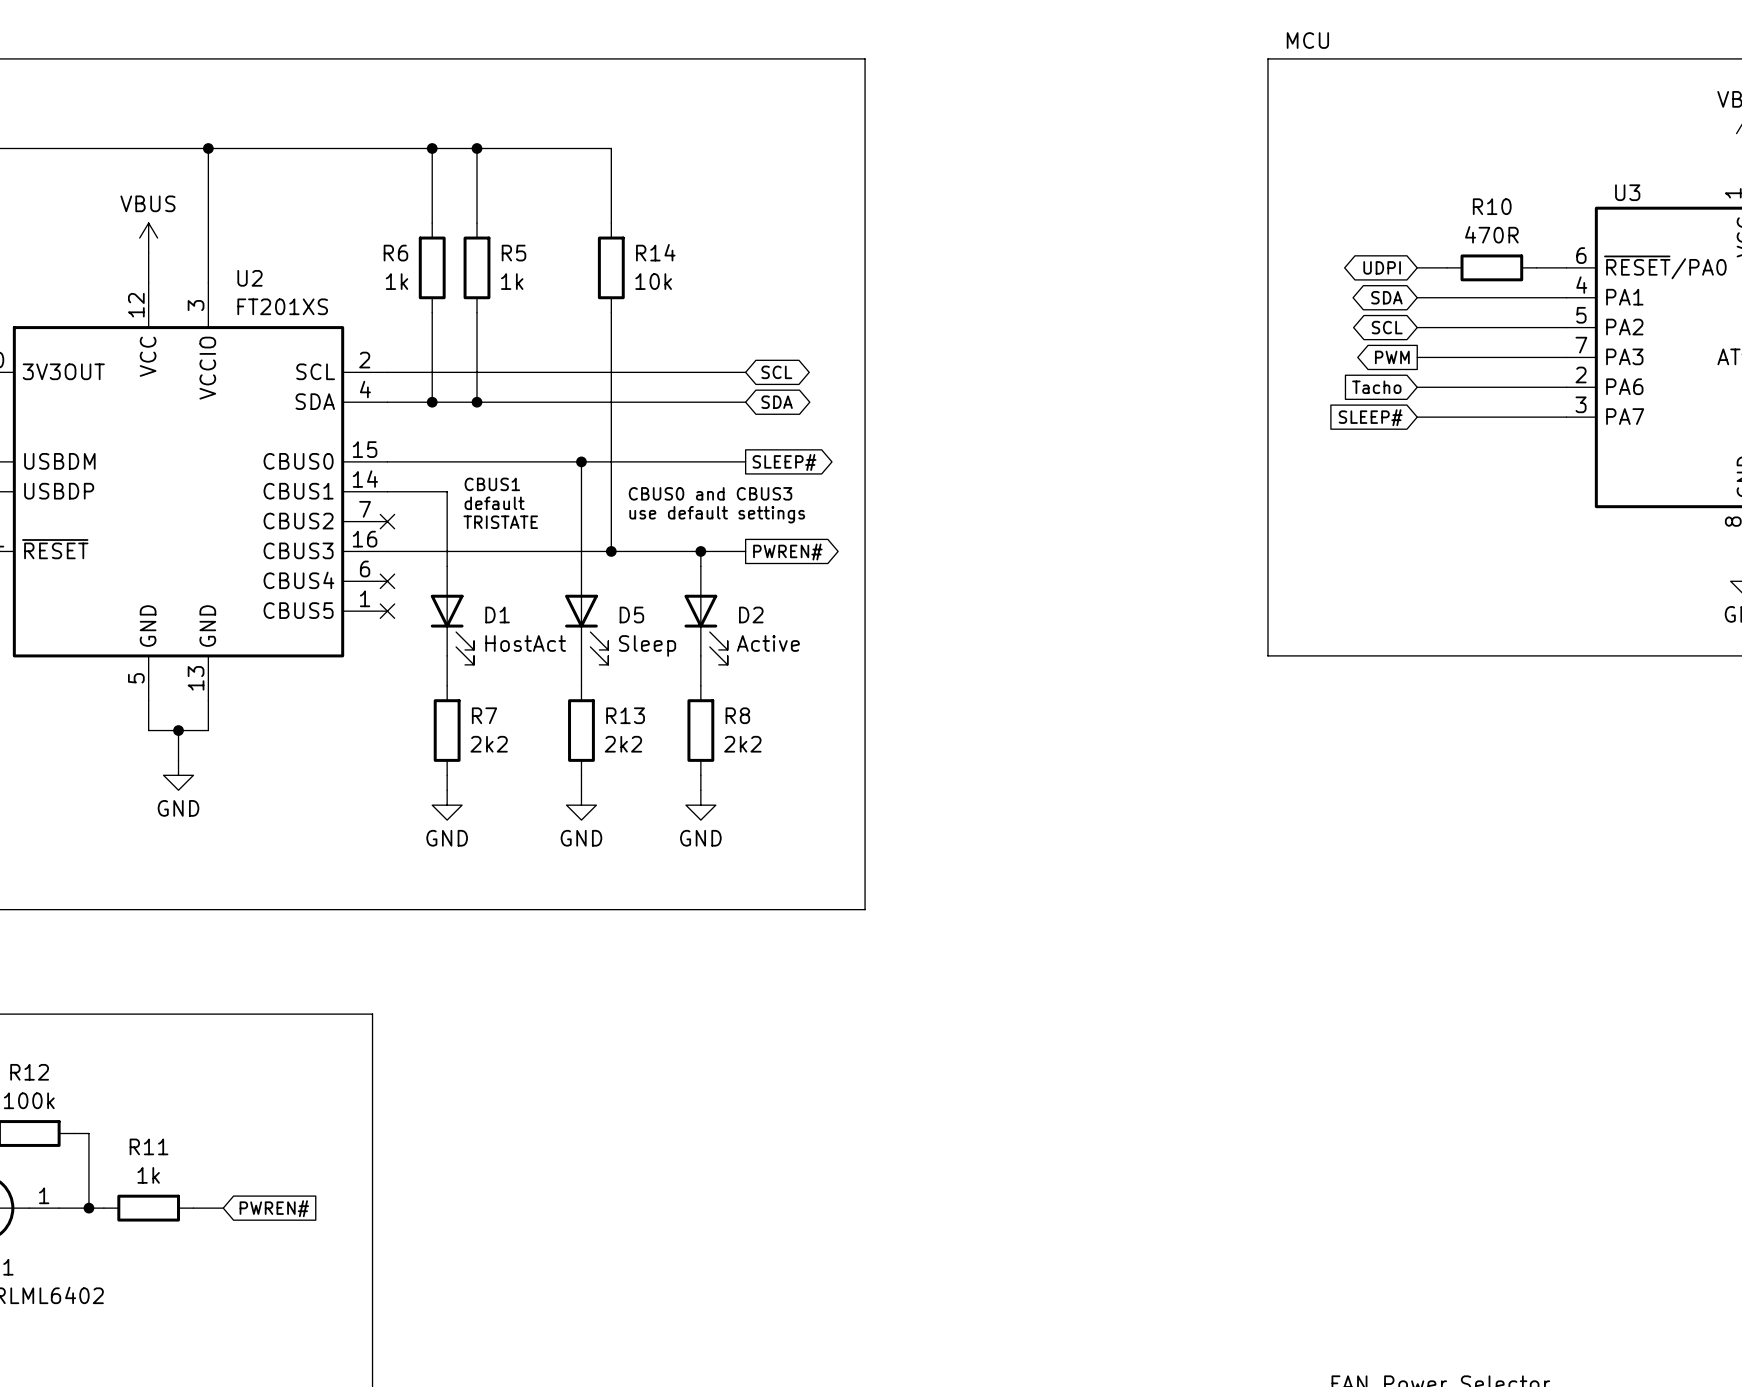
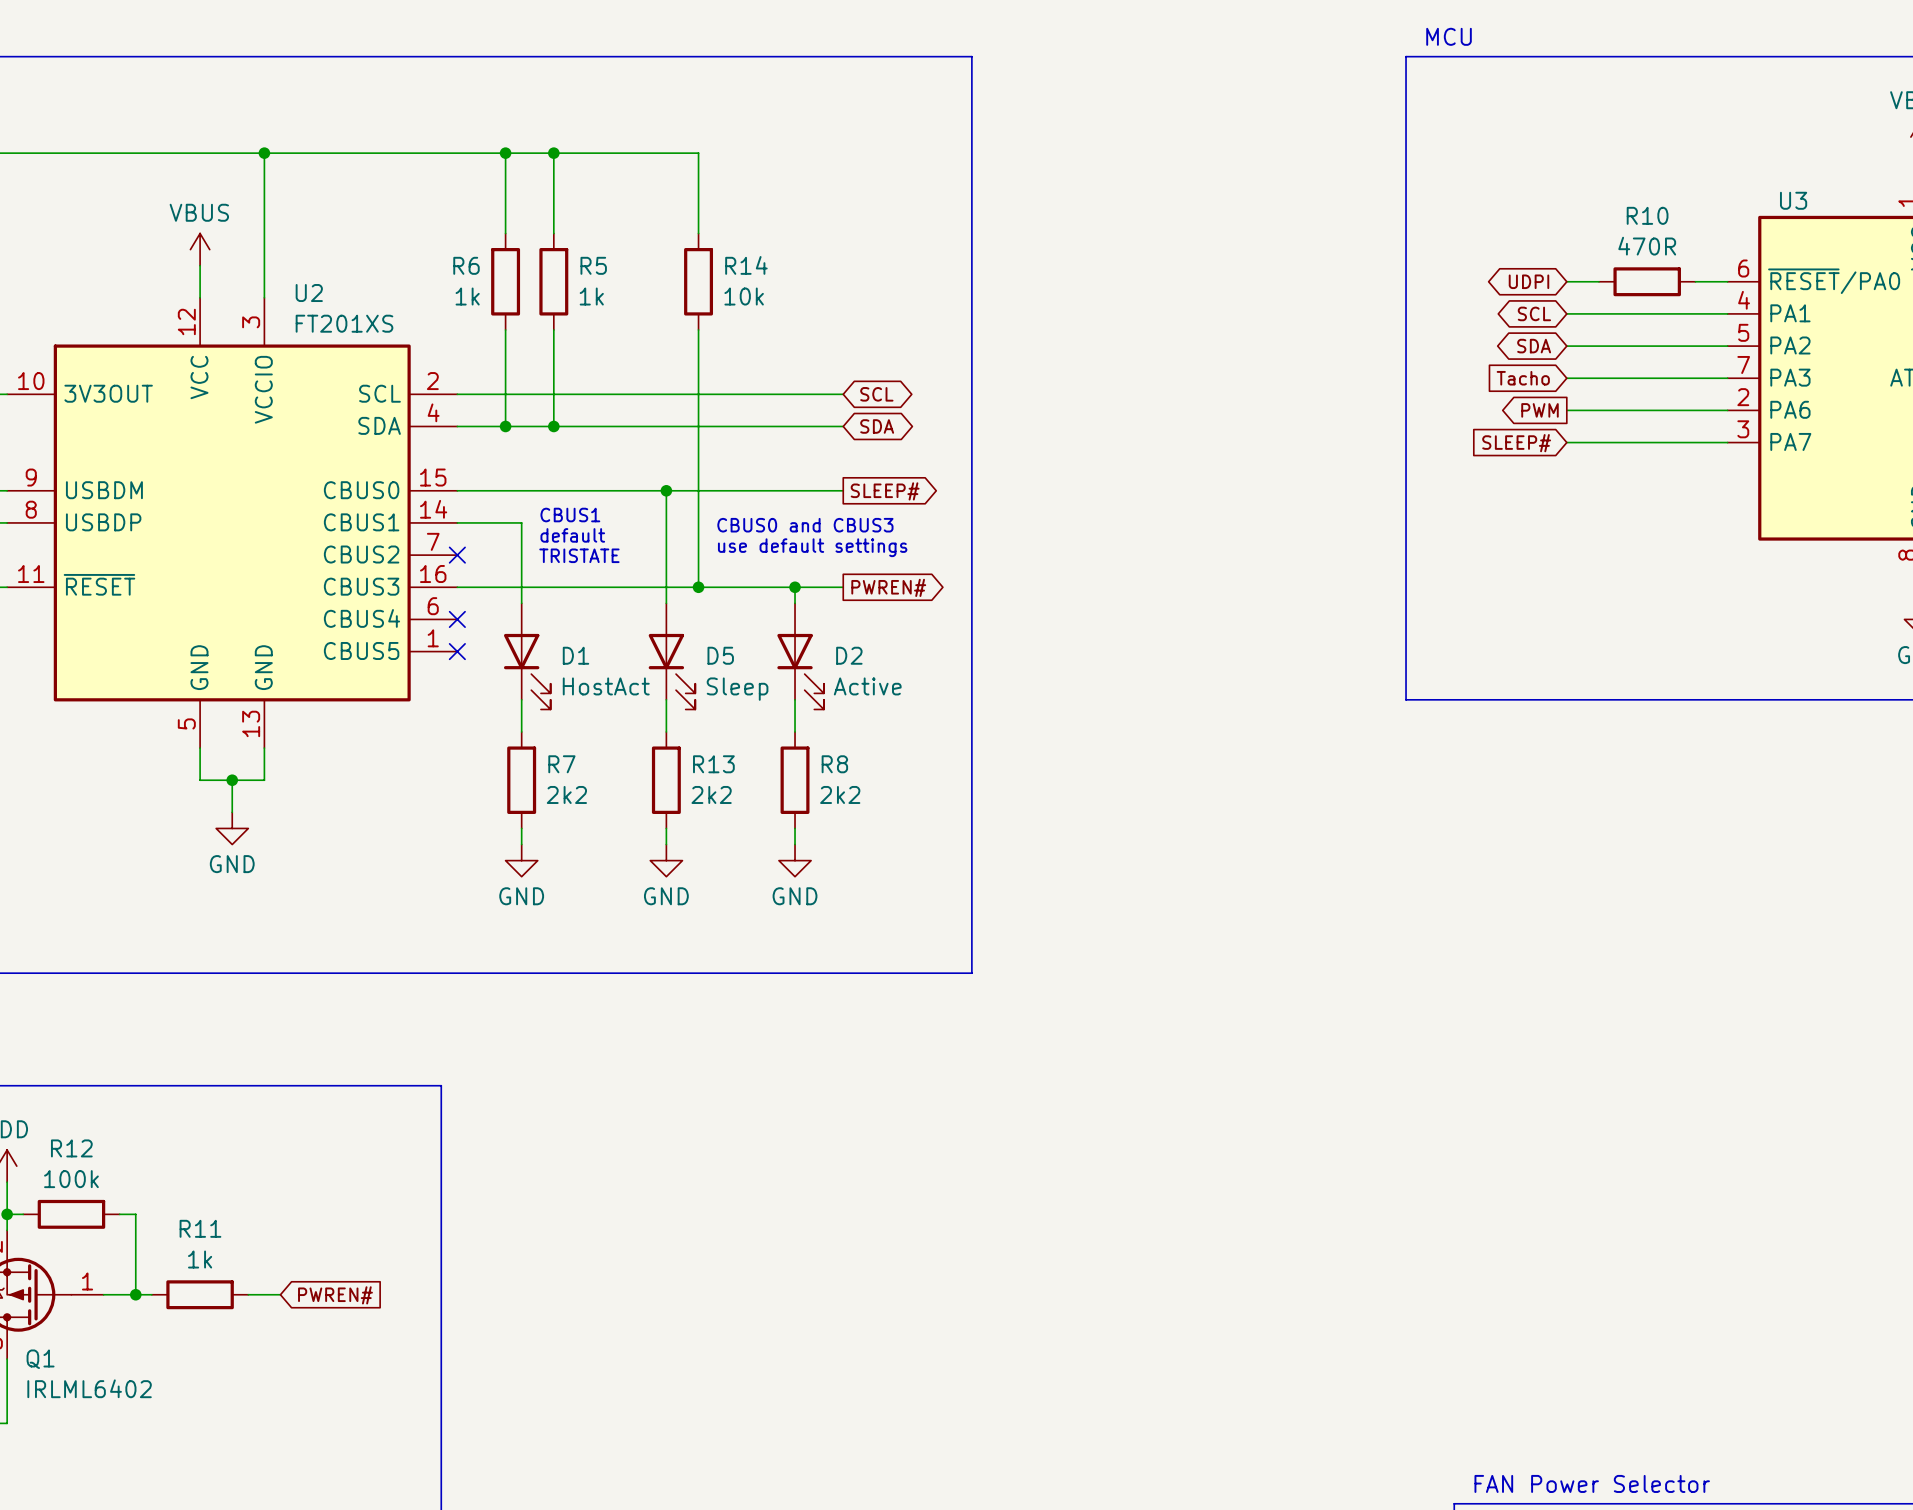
global label: SDA (1386, 297) -> SCL (1534, 313)
global label: SCL (1387, 327) -> SDA (1534, 346)
global label shape: output (1392, 357) -> input (1523, 378)
global label: PWM (1392, 357) -> Tacho (1523, 378)
global label shape: input (1376, 387) -> output (1539, 410)
global label: Tacho (1376, 387) -> PWM (1539, 410)

